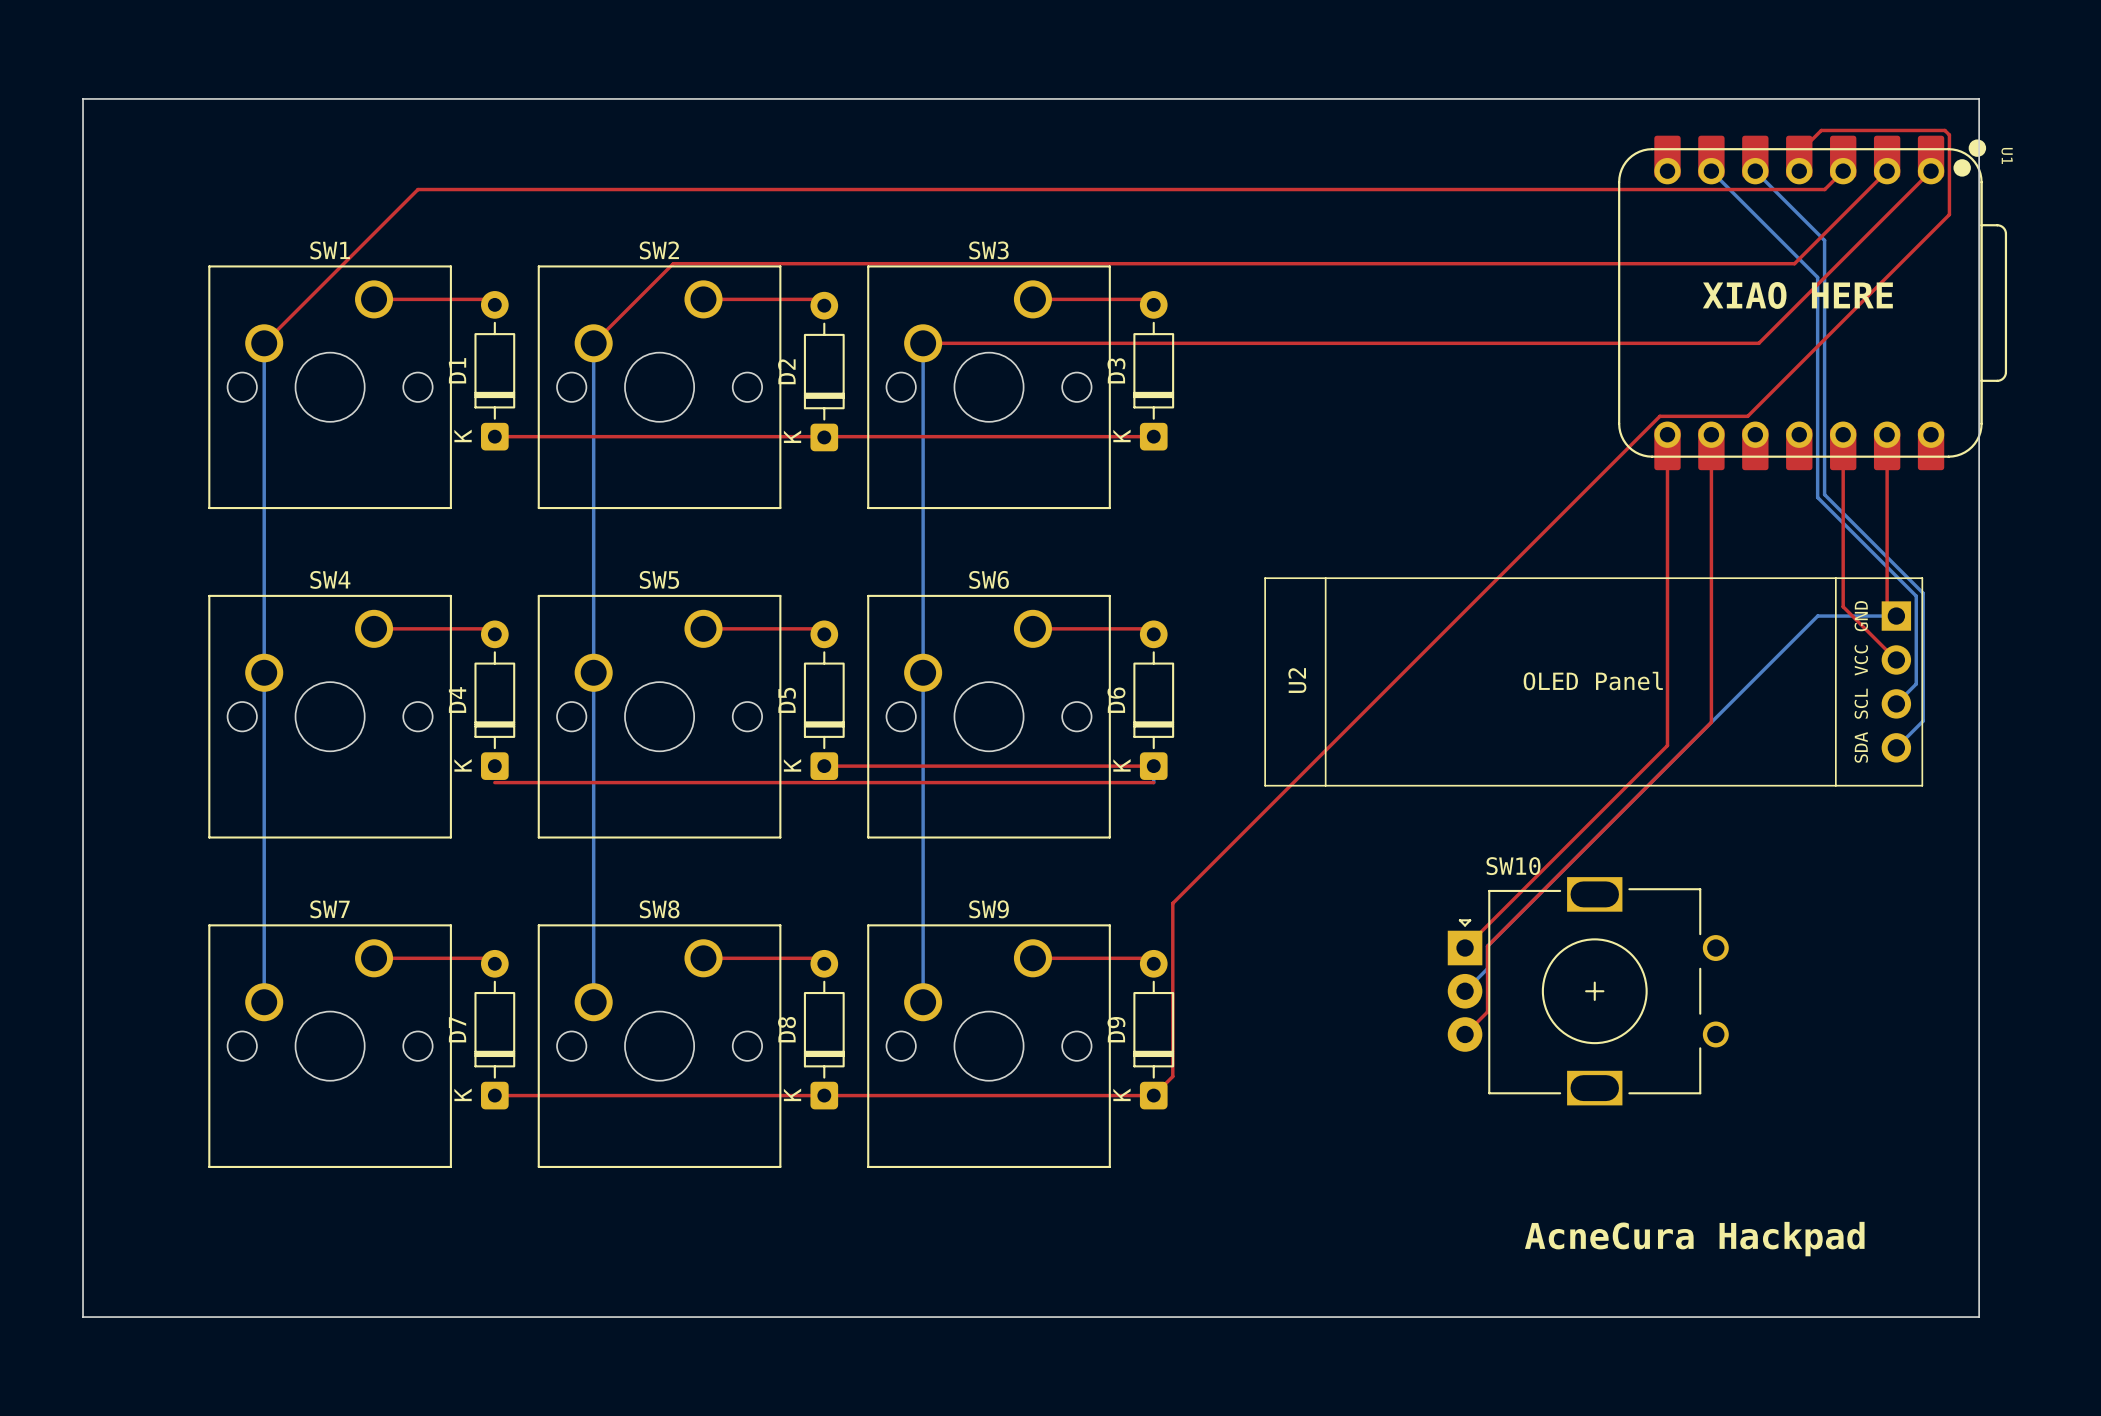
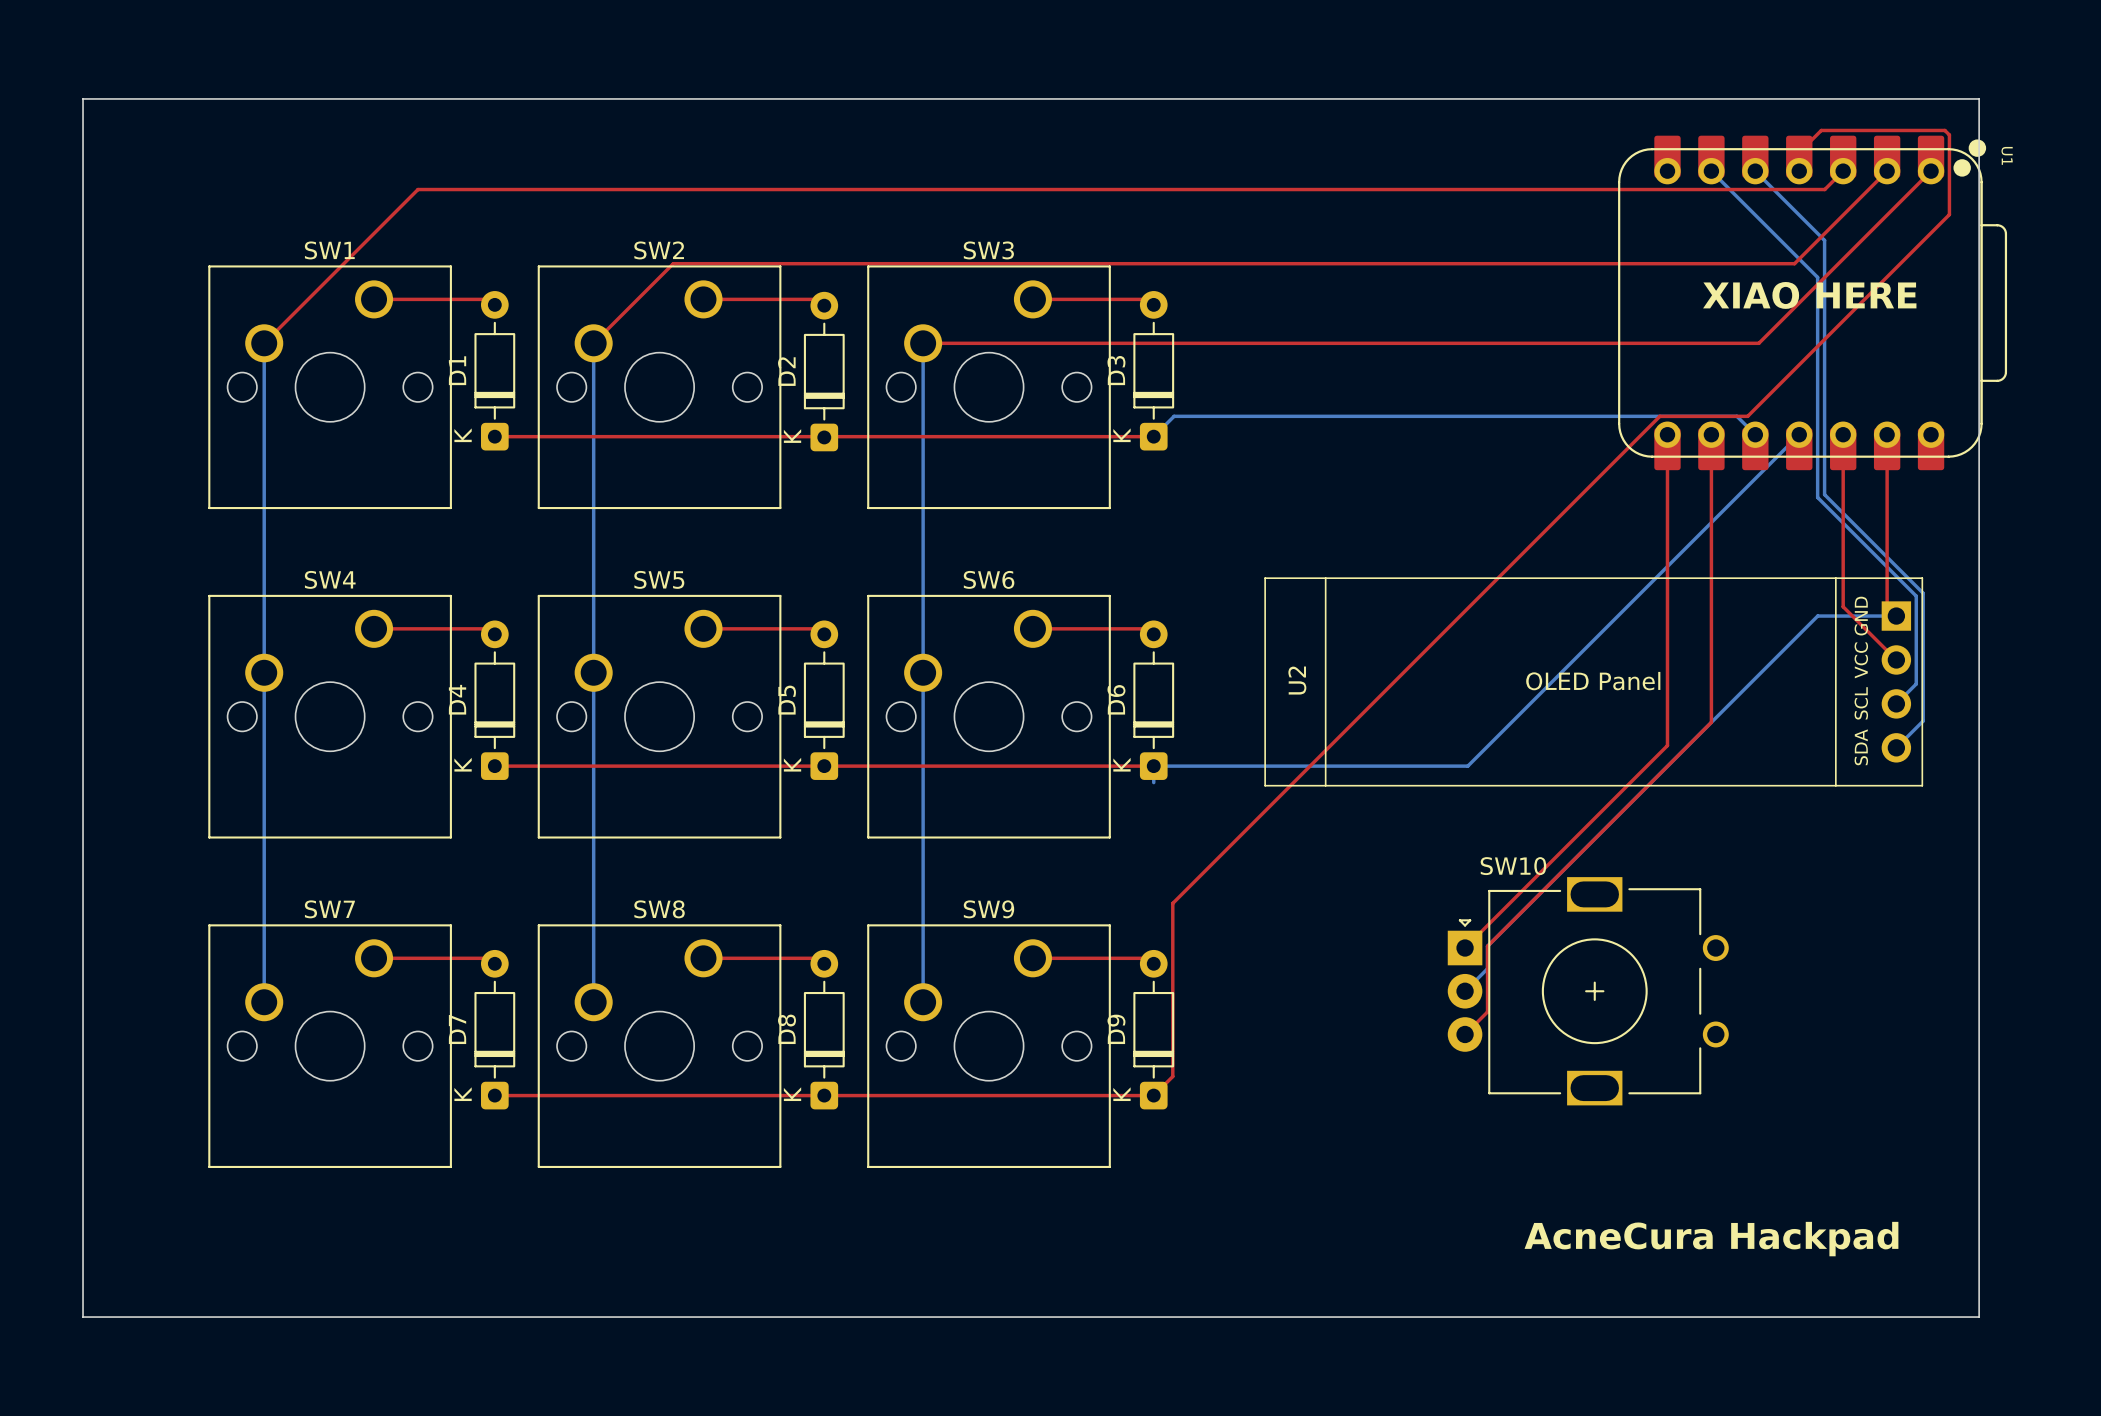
bottom track: none -> (1755, 434) (1736, 416) (1174, 416) (1153, 436)
bottom track: none -> (1799, 434) (1467, 766) (1153, 766)
top track: none -> (494, 766) (824, 766)
top track: (494, 782) (1153, 782) -> none

